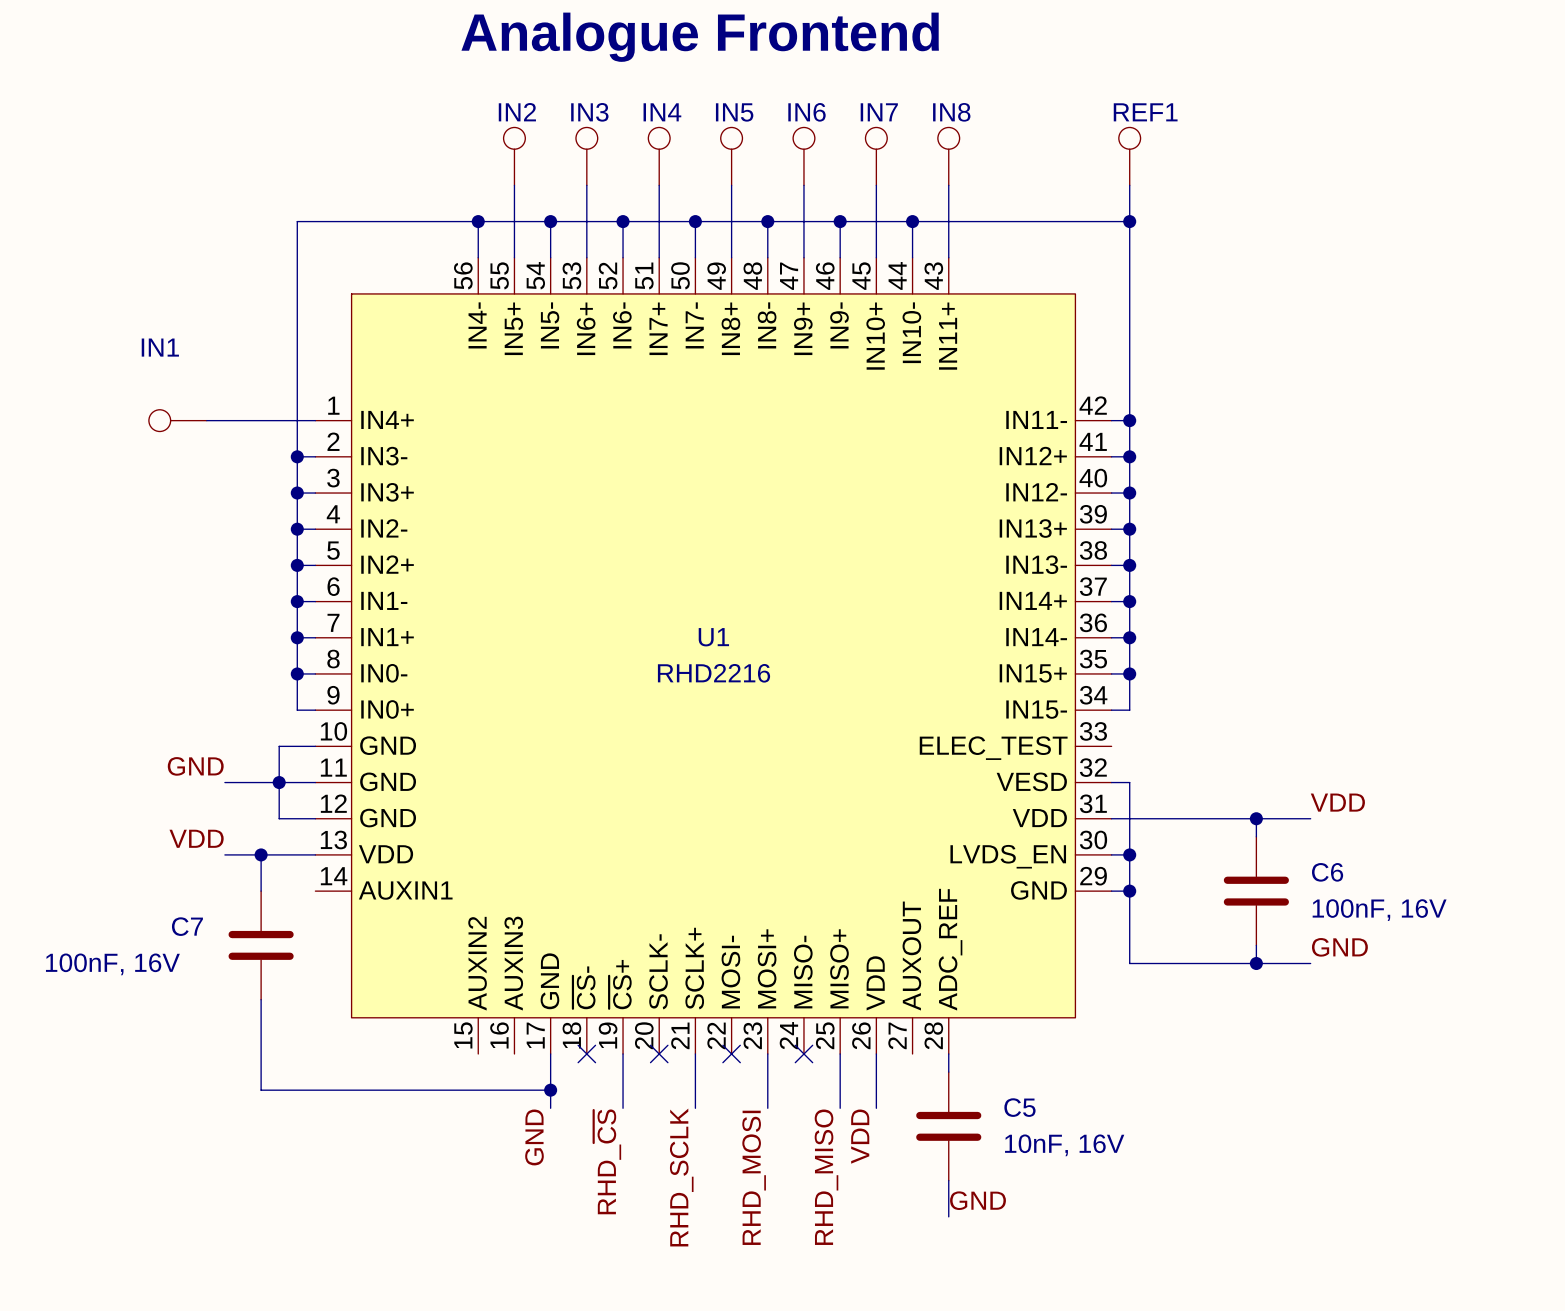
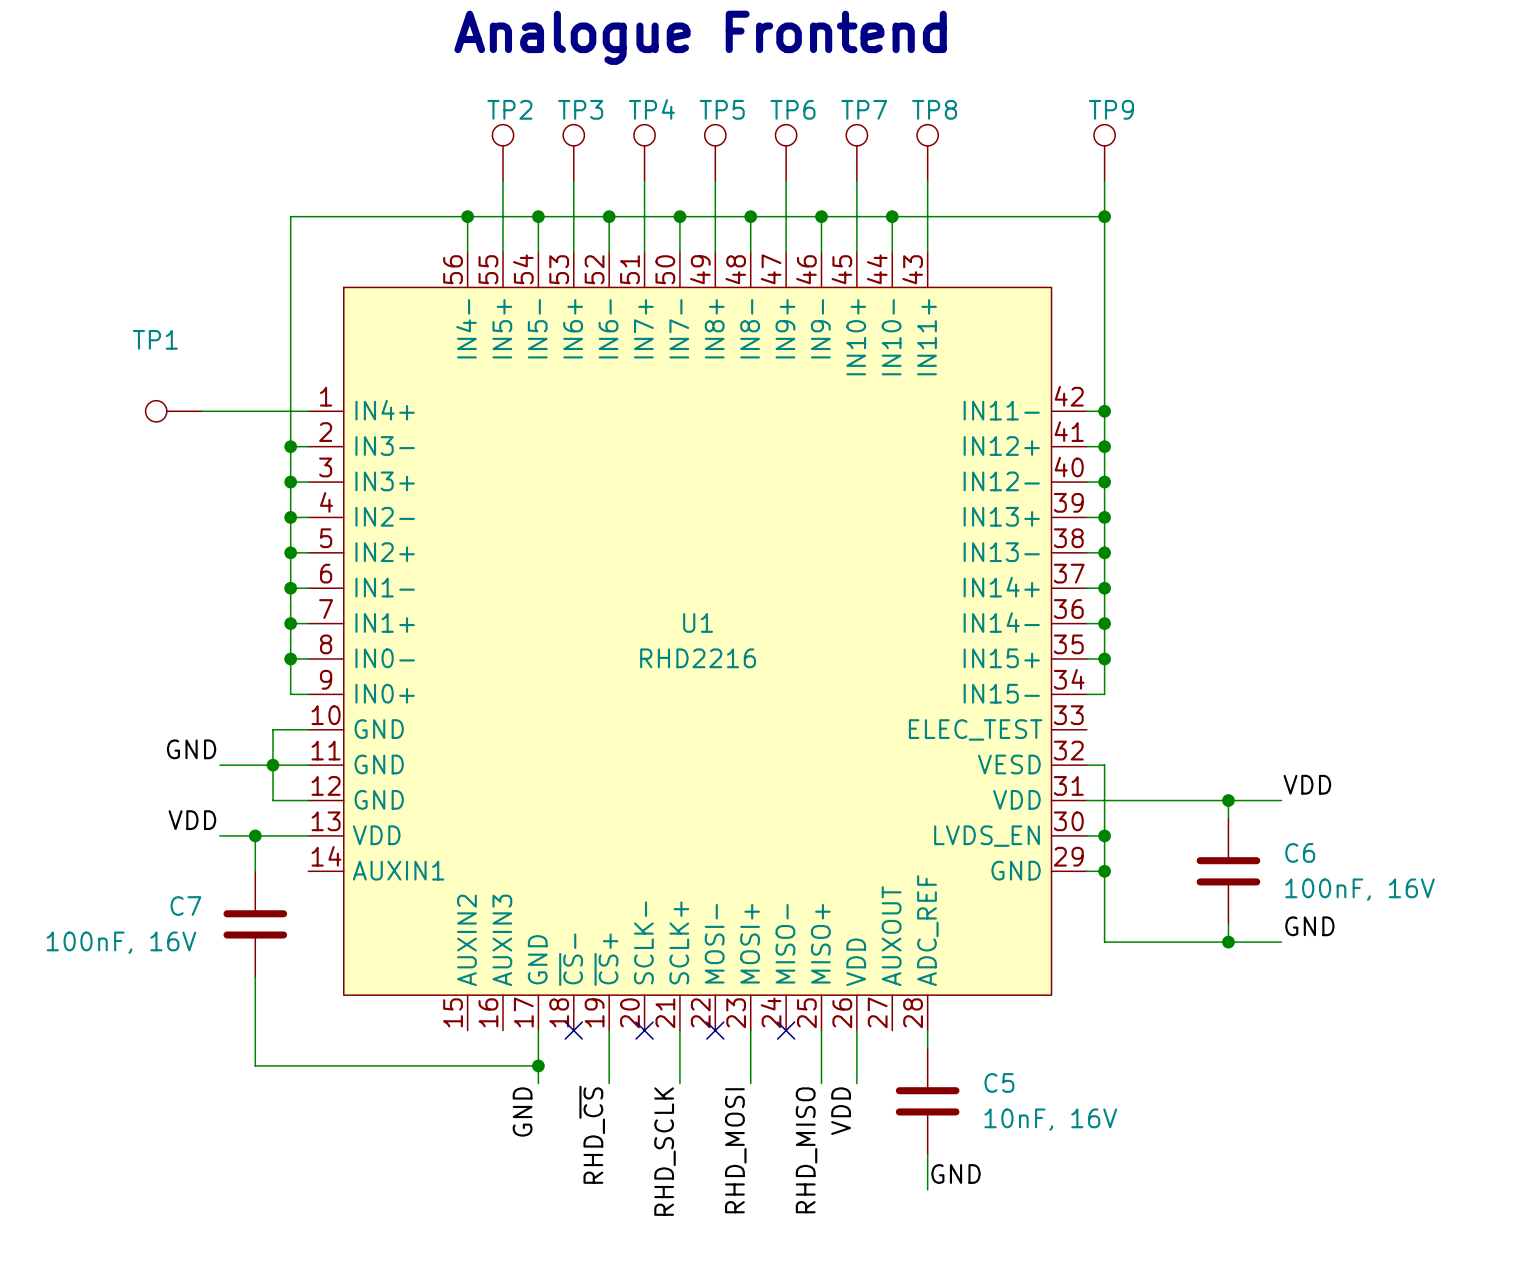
IN2 name: IN2 (517, 112) -> TP2 (509, 109)
IN3 name: IN3 (589, 112) -> TP3 (580, 109)
IN4 name: IN4 (662, 112) -> TP4 (651, 109)
IN5 name: IN5 (734, 112) -> TP5 (722, 109)
IN6 name: IN6 (806, 112) -> TP6 (792, 109)
IN7 name: IN7 (879, 112) -> TP7 (864, 109)
IN8 name: IN8 (951, 112) -> TP8 (934, 109)
REF1 name: REF1 (1145, 112) -> TP9 (1111, 109)
IN1 name: IN1 (160, 347) -> TP1 (155, 339)

